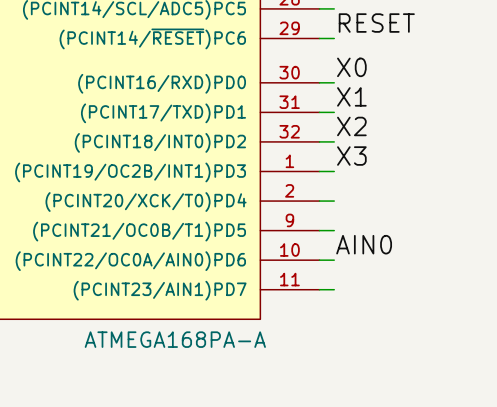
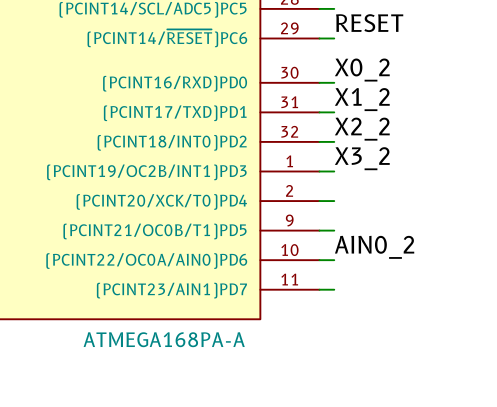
label: X0 (351, 67) -> X0_2 (362, 70)
label: X1 (351, 96) -> X1_2 (362, 99)
label: X2 (351, 126) -> X2_2 (362, 129)
label: X3 (351, 156) -> X3_2 (362, 158)
label: AIN0 (364, 244) -> AIN0_2 (374, 247)

